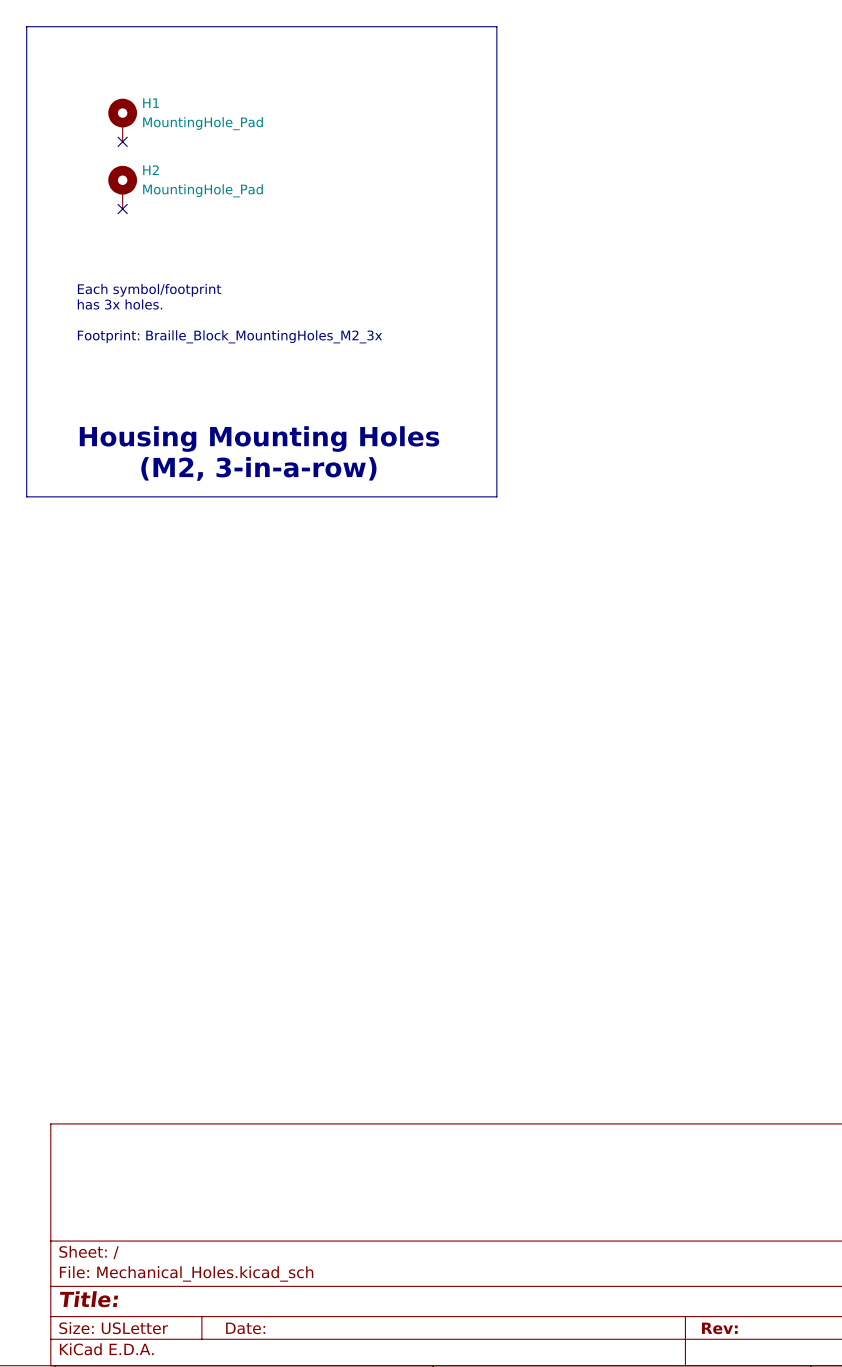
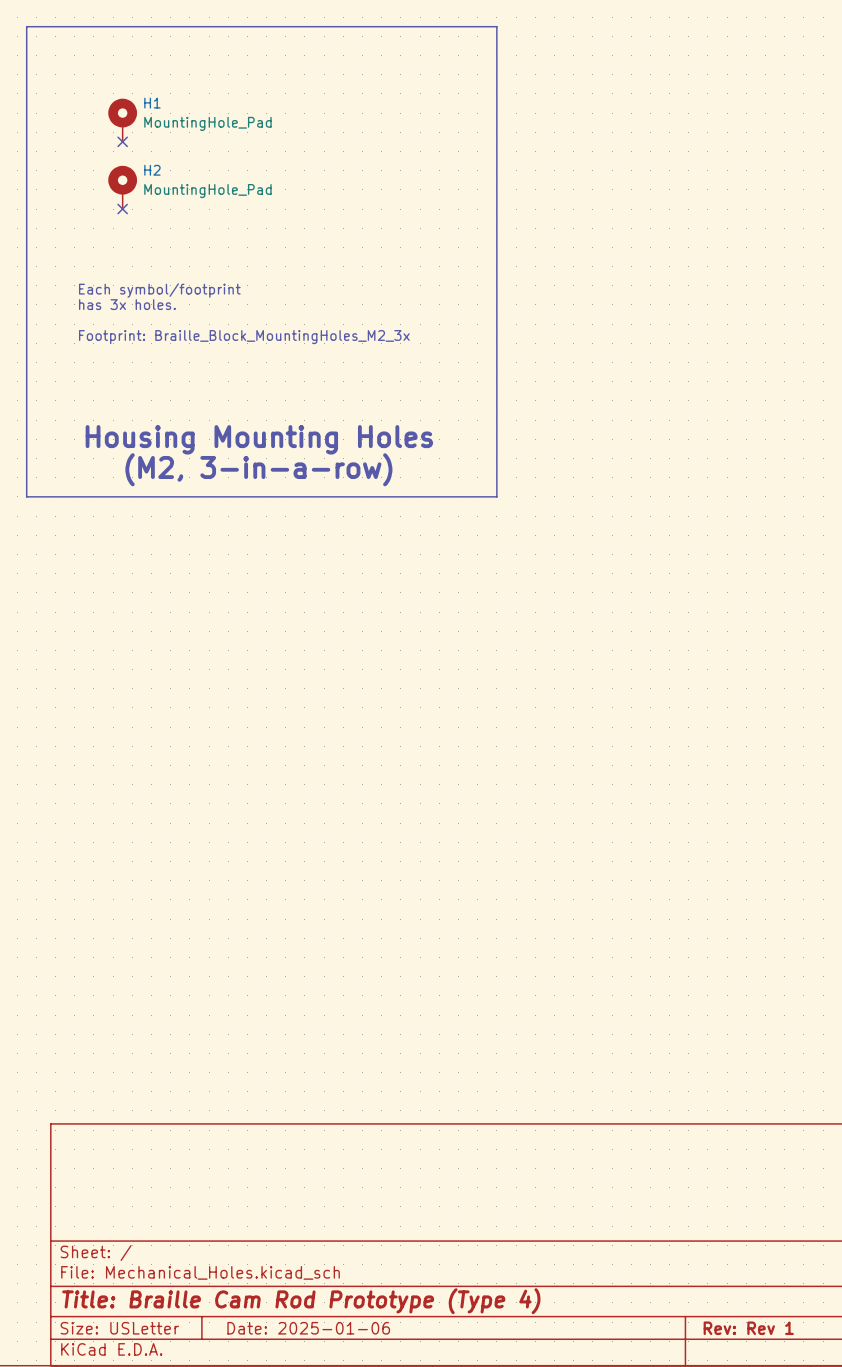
title block: Title: (89, 1299) -> Title: Braille Cam Rod Prototype (Type 4) (301, 1301)
title block: Date: (245, 1328) -> Date: 2025-01-06 (308, 1328)
title block: Rev: (719, 1328) -> Rev: Rev 1 (748, 1328)

